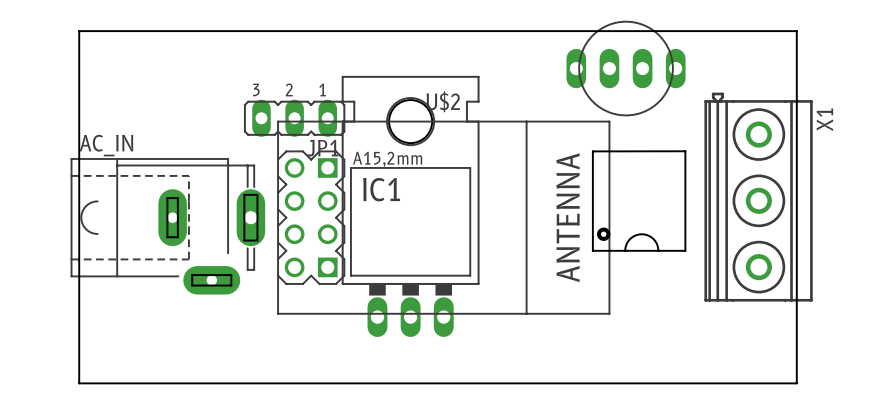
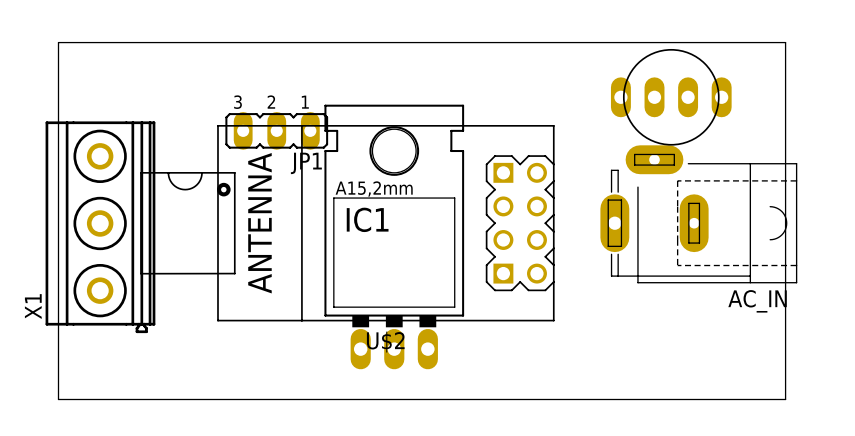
part position: (626, 68) -> (671, 97)
U$2 name position: U$2 (443, 101) -> U$2 (385, 342)
U$2 footprint: [277, 120, 611, 315] -> [217, 125, 555, 322]
X1 rotation: 0° (758, 197) -> 180° (100, 227)
X1 position: (758, 197) -> (100, 227)
AC_IN: none -> (698, 214)
part: (639, 201) -> none
IC1 position: (410, 206) -> (394, 236)
part: none -> (187, 223)
AC_IN: (168, 226) -> none

